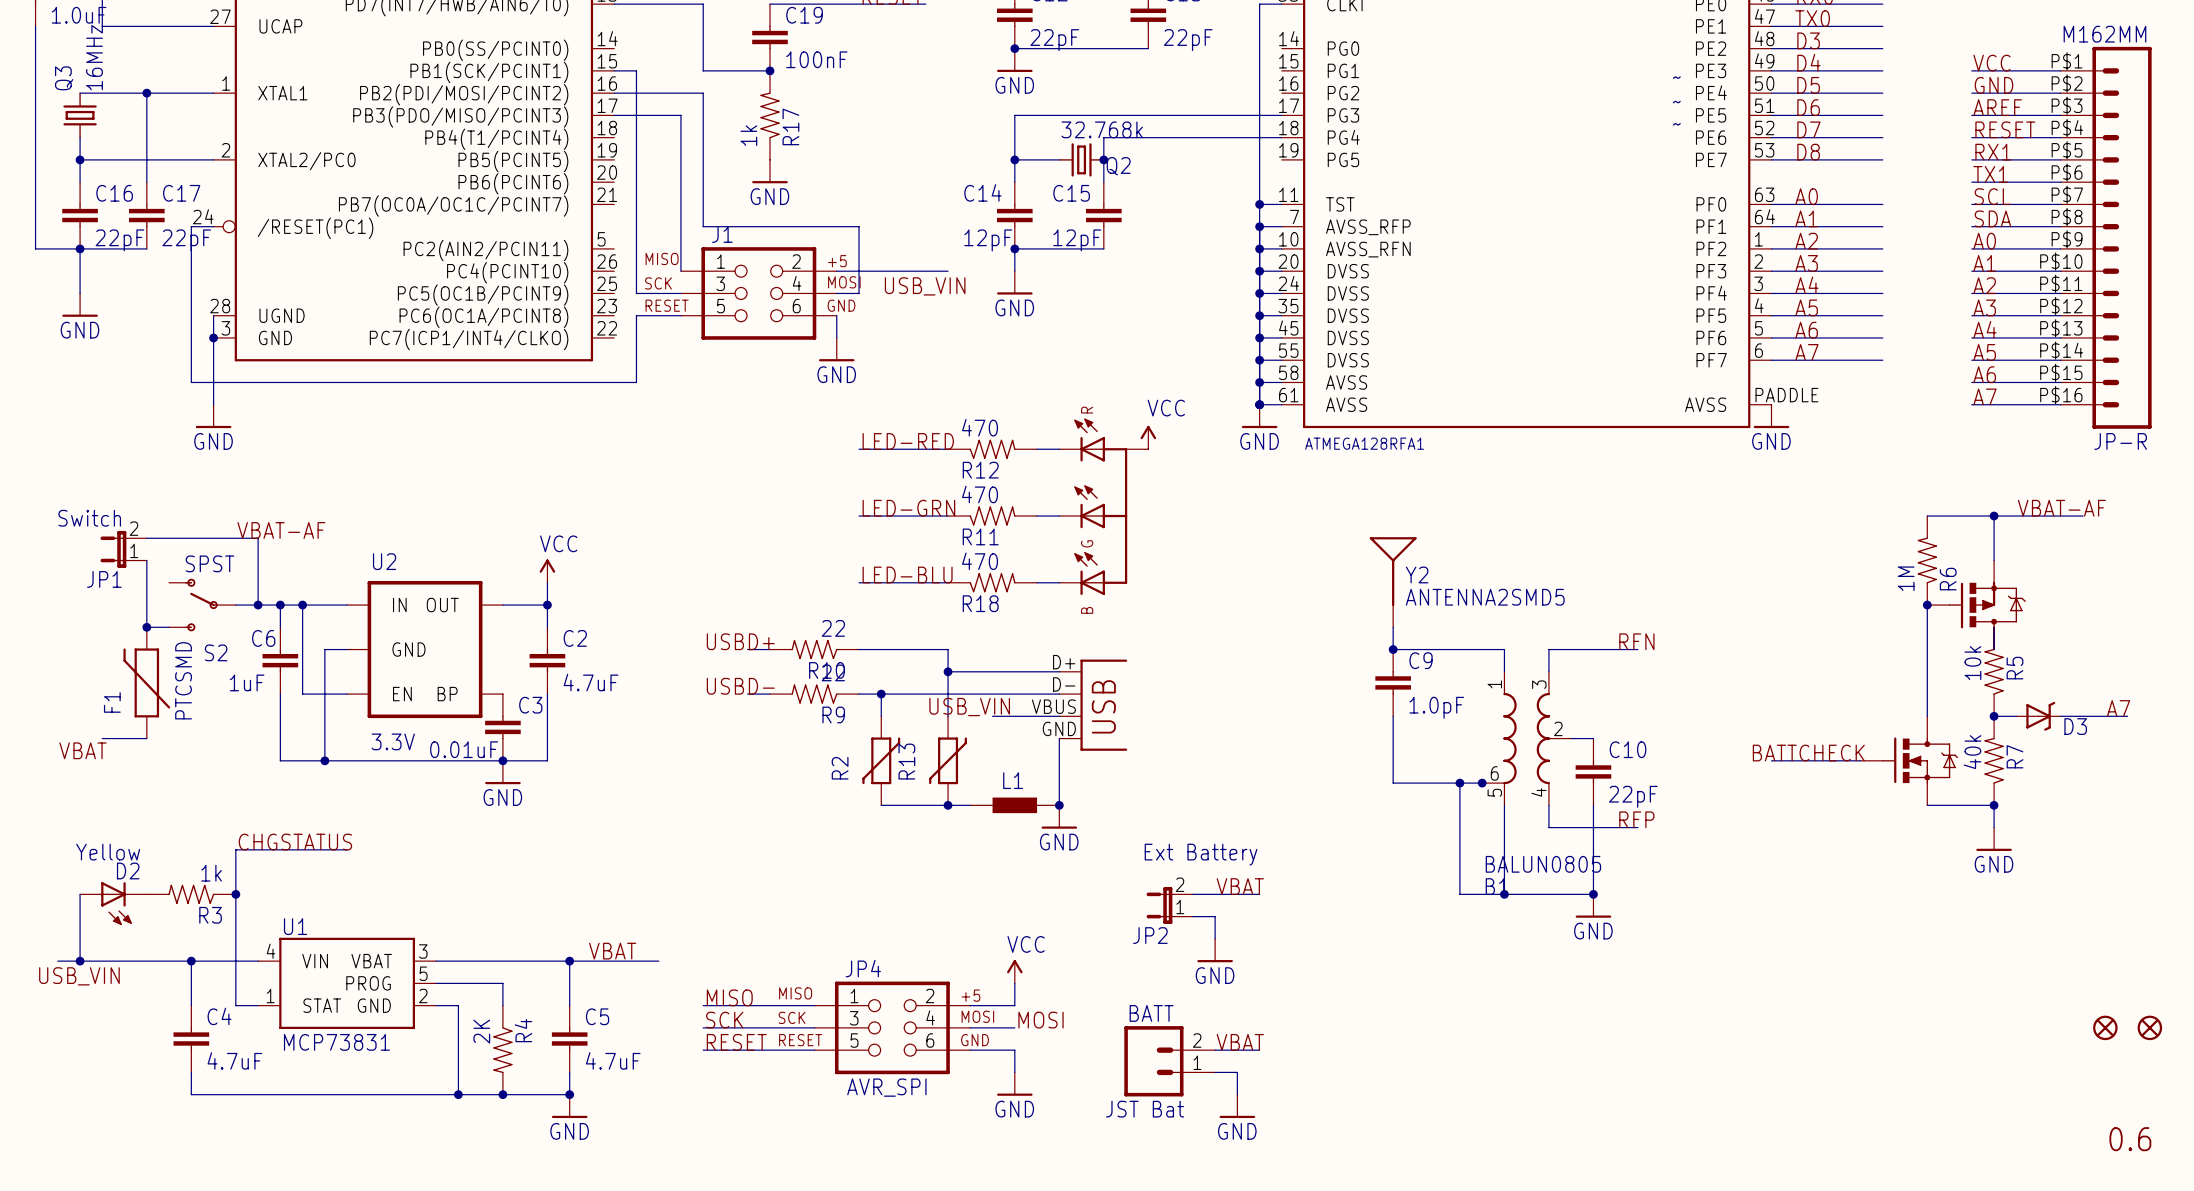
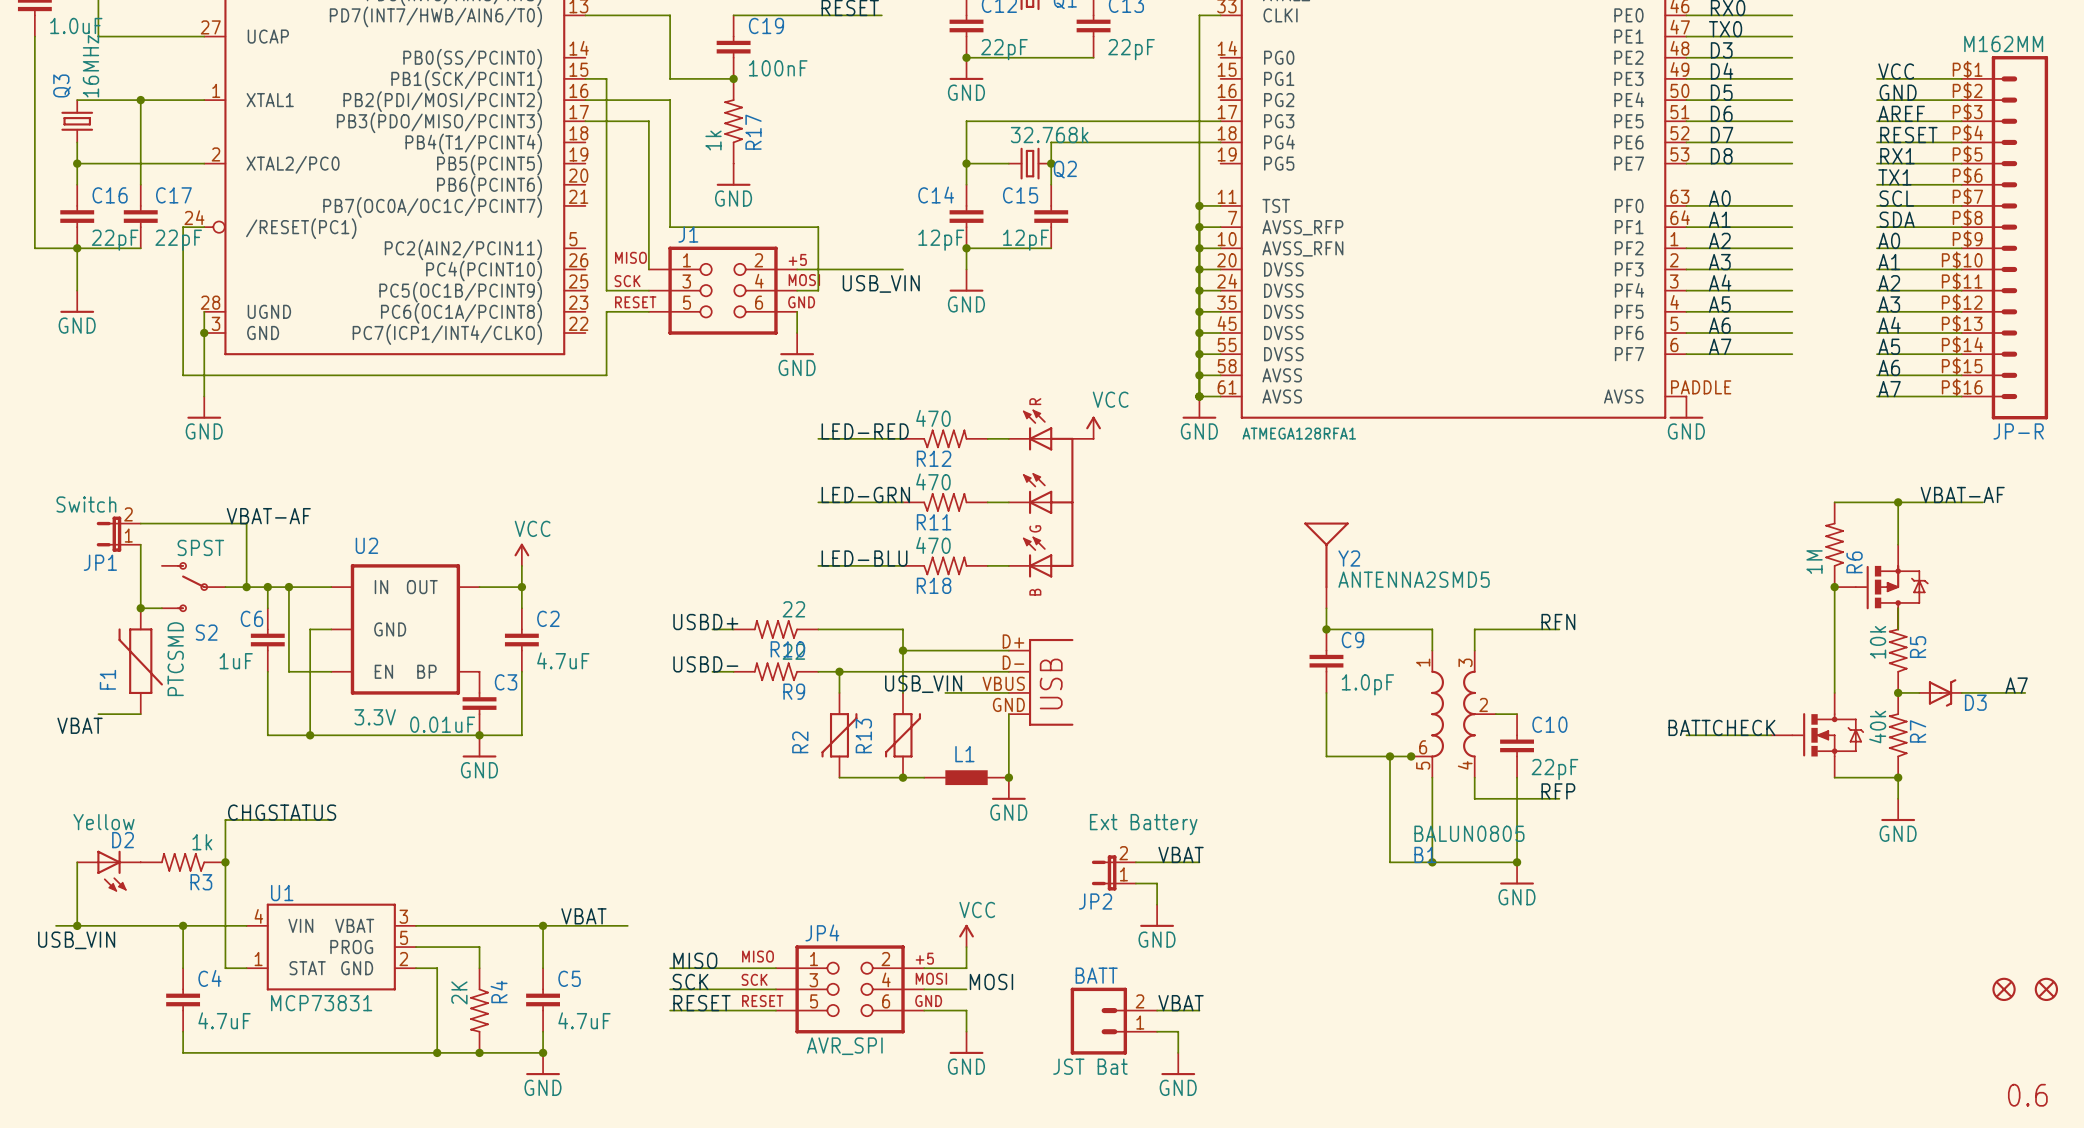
text: ~ (1676, 77) -> none
text: ~ (1676, 102) -> none
text: ~ (1676, 124) -> none

